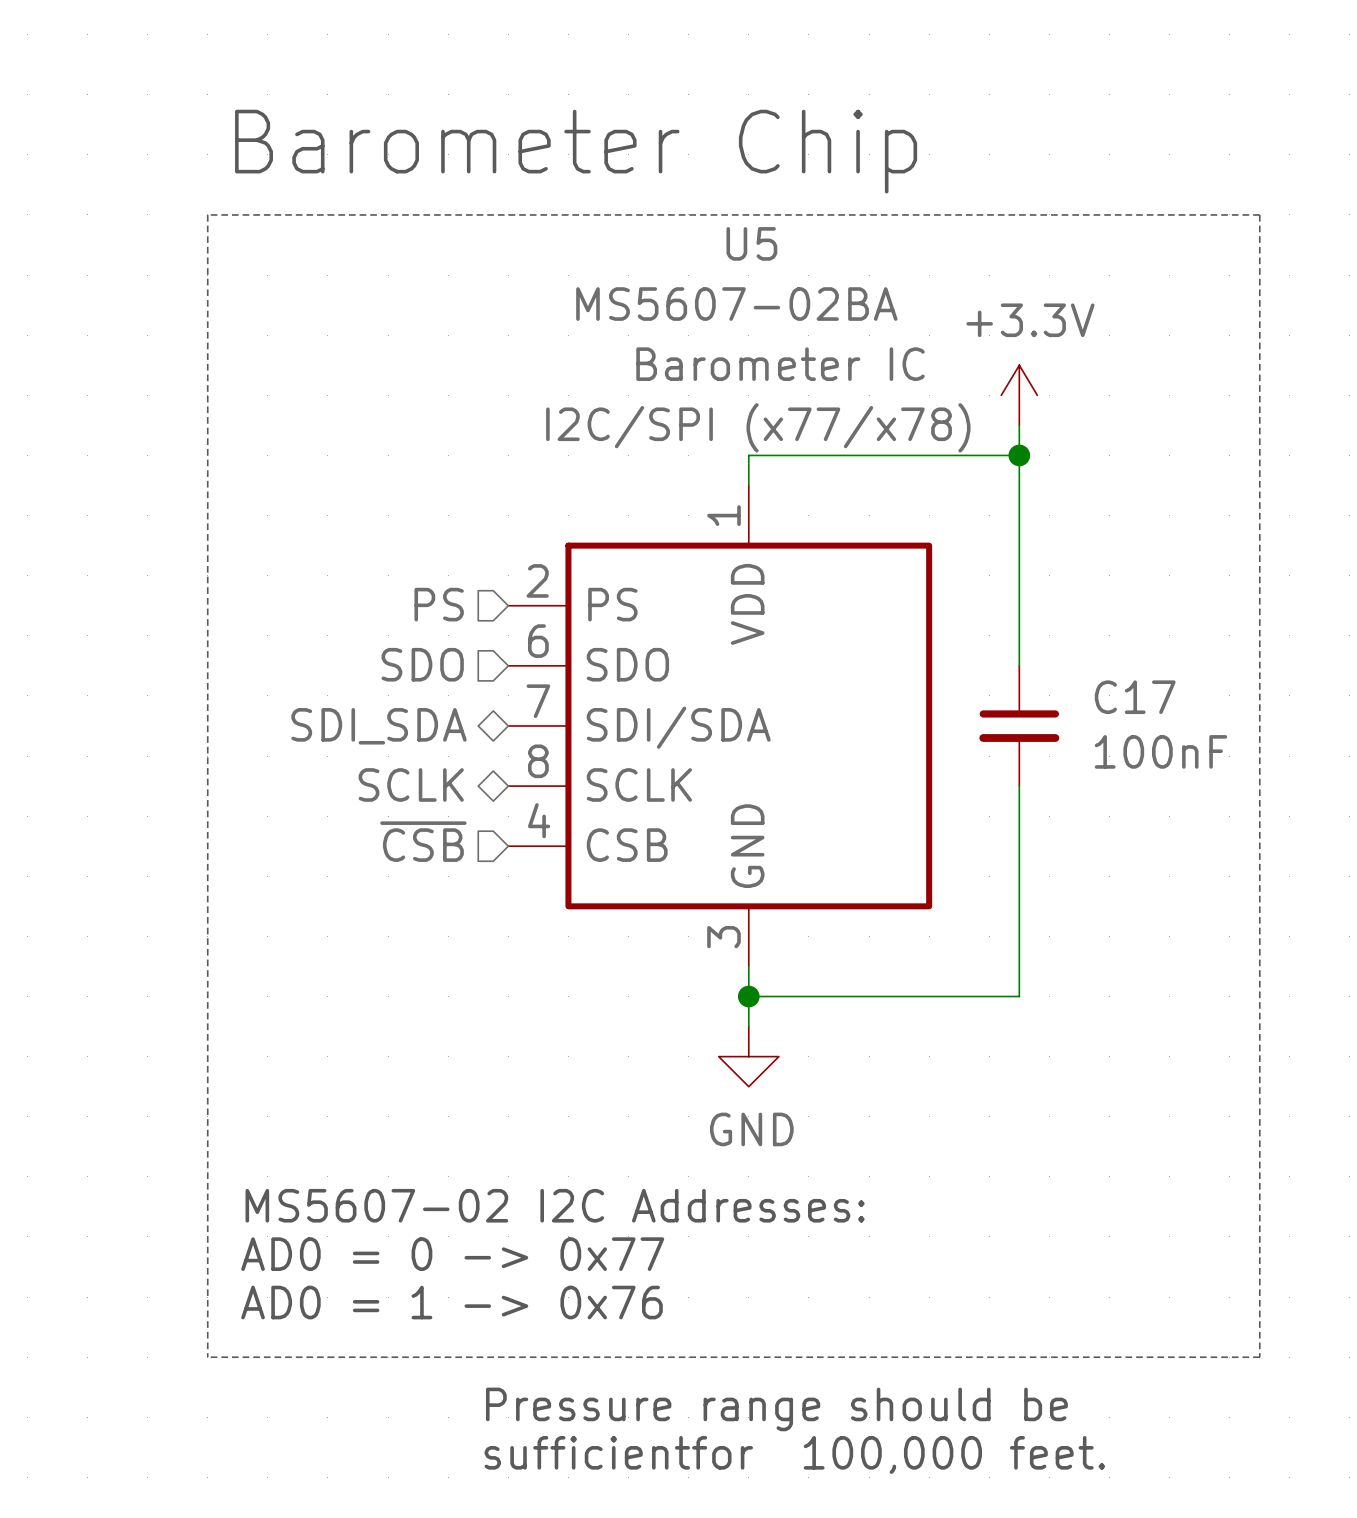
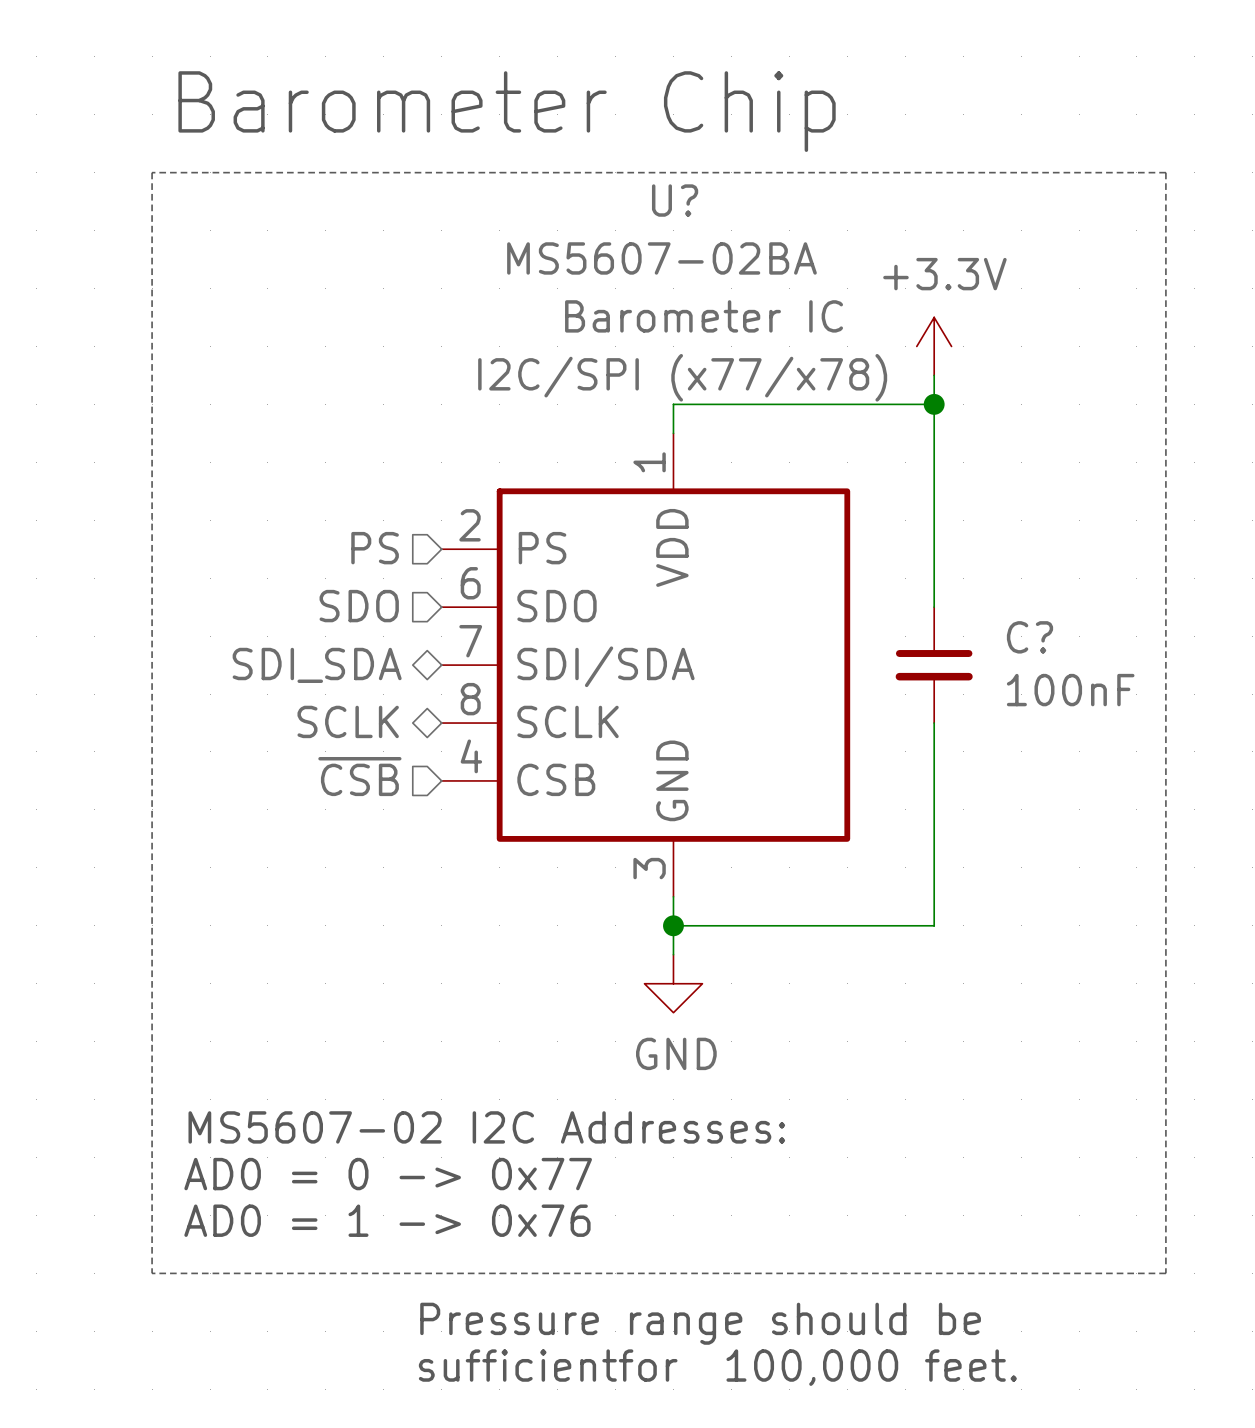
U5 name: U5 (751, 243) -> U? (675, 200)
C17 name: C17 (1135, 697) -> C? (1029, 637)

